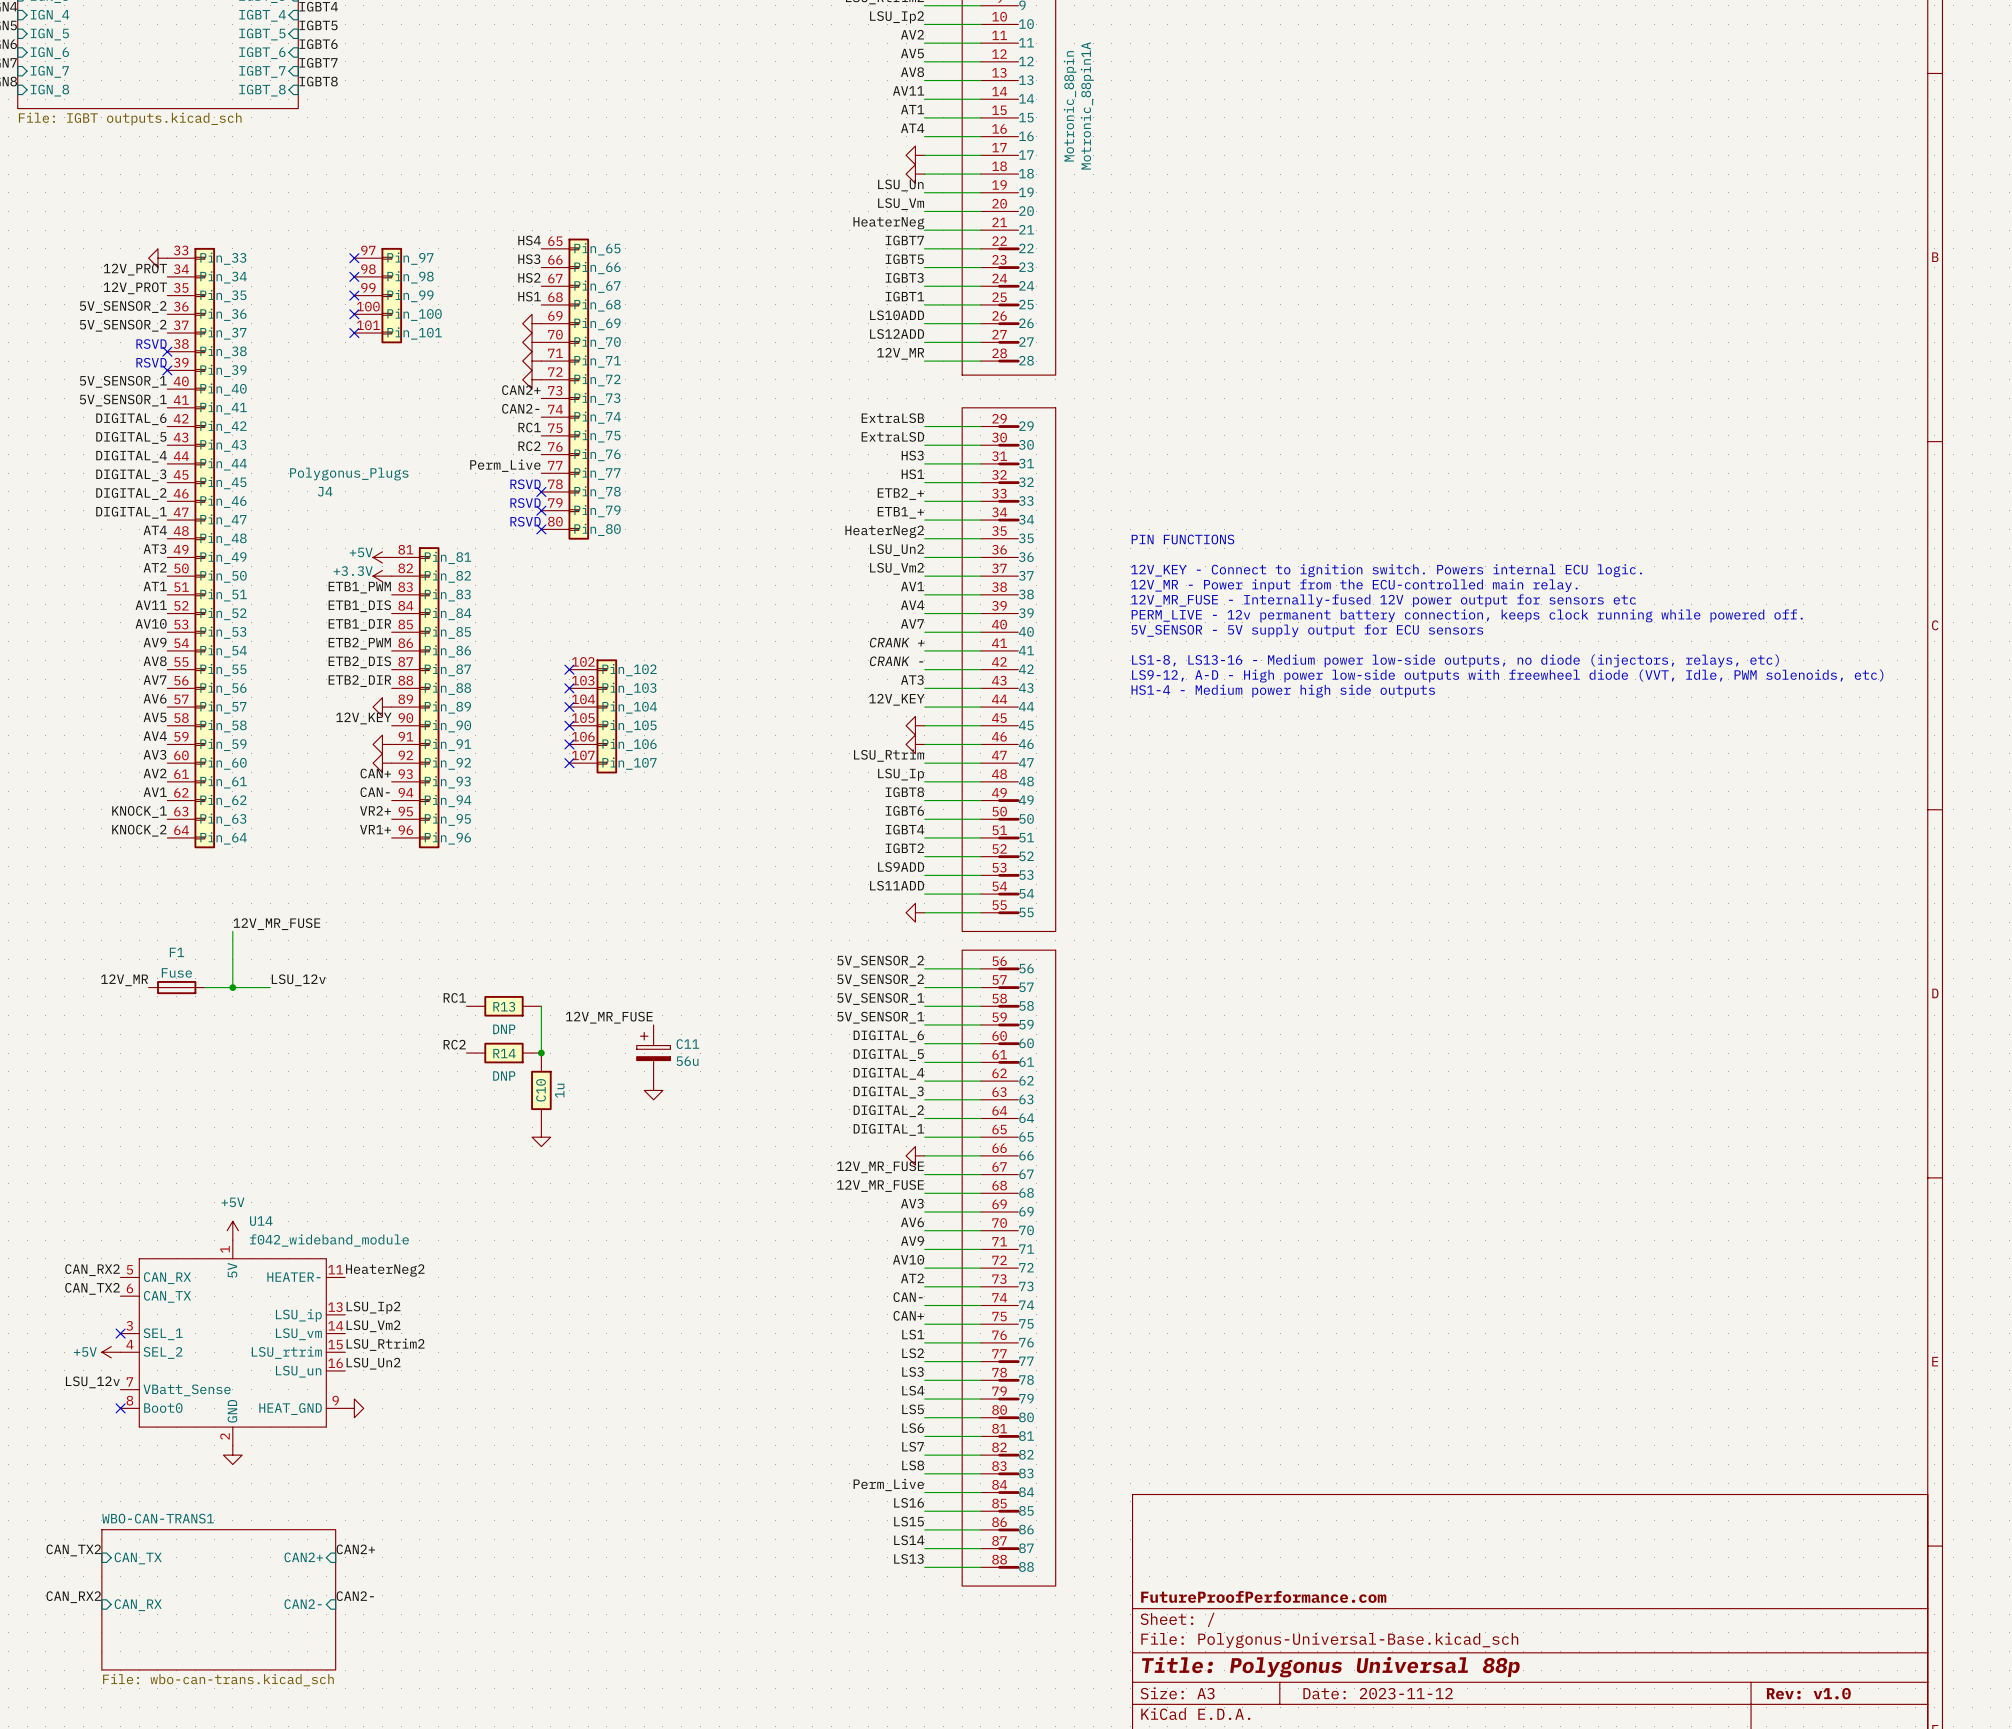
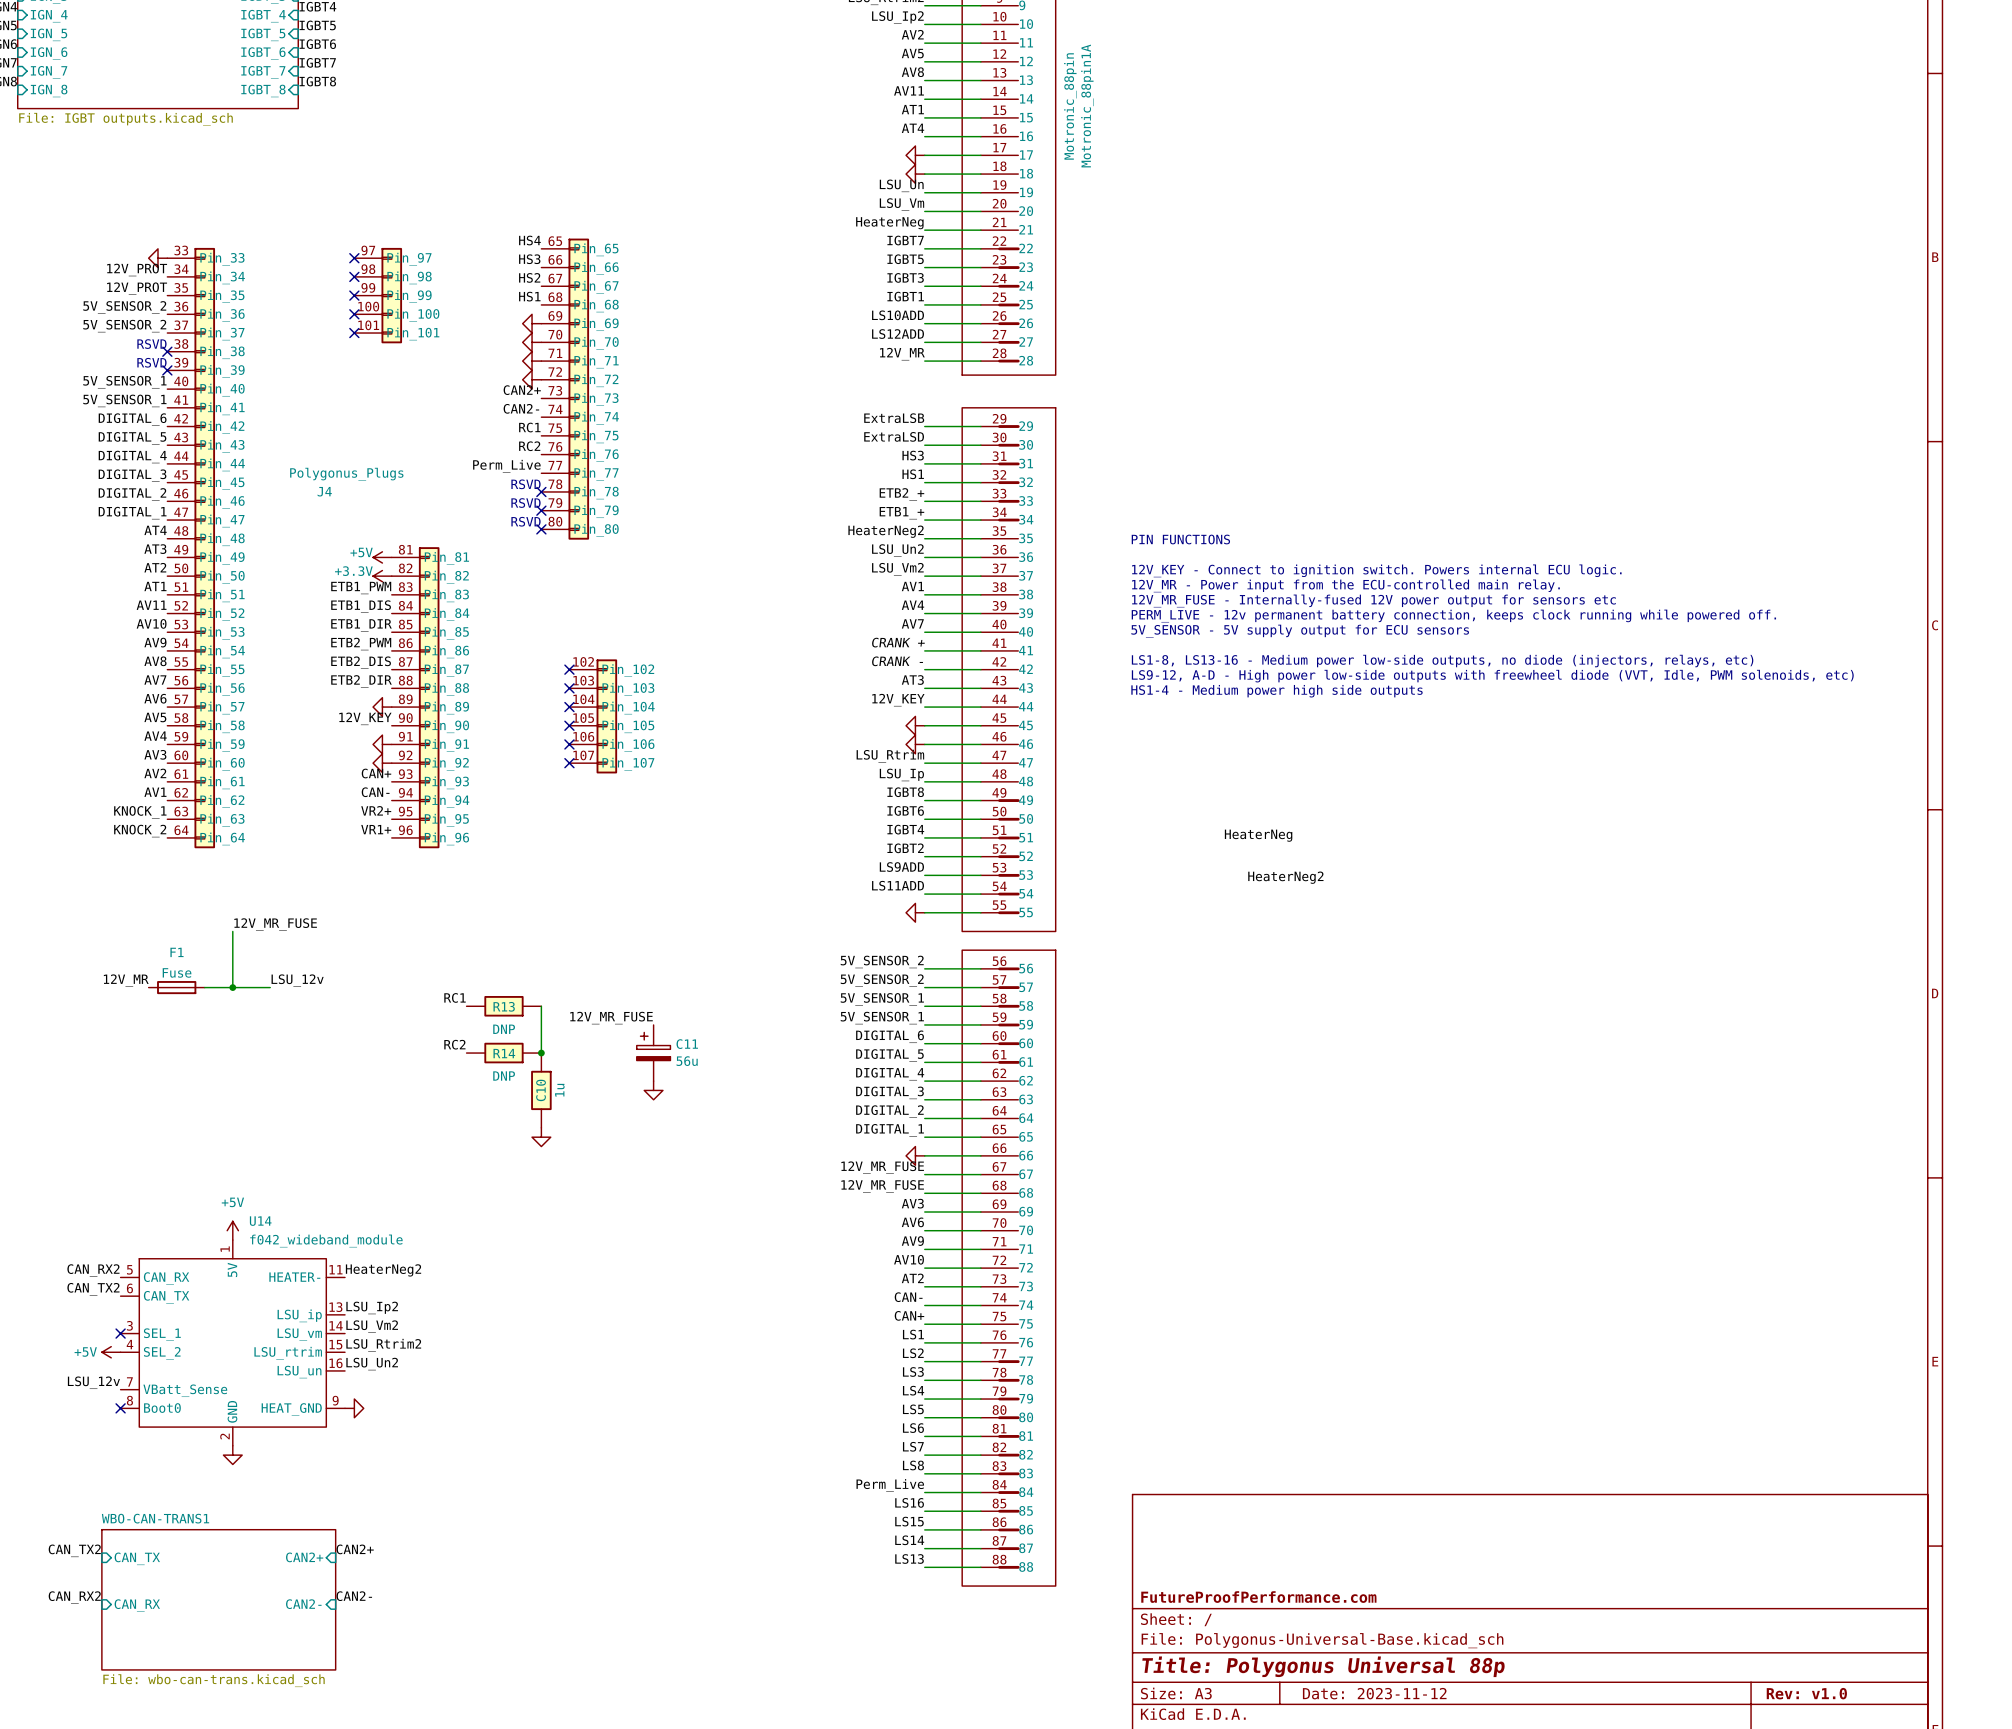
label: none -> HeaterNeg (1258, 835)
label: none -> HeaterNeg2 (1285, 877)

